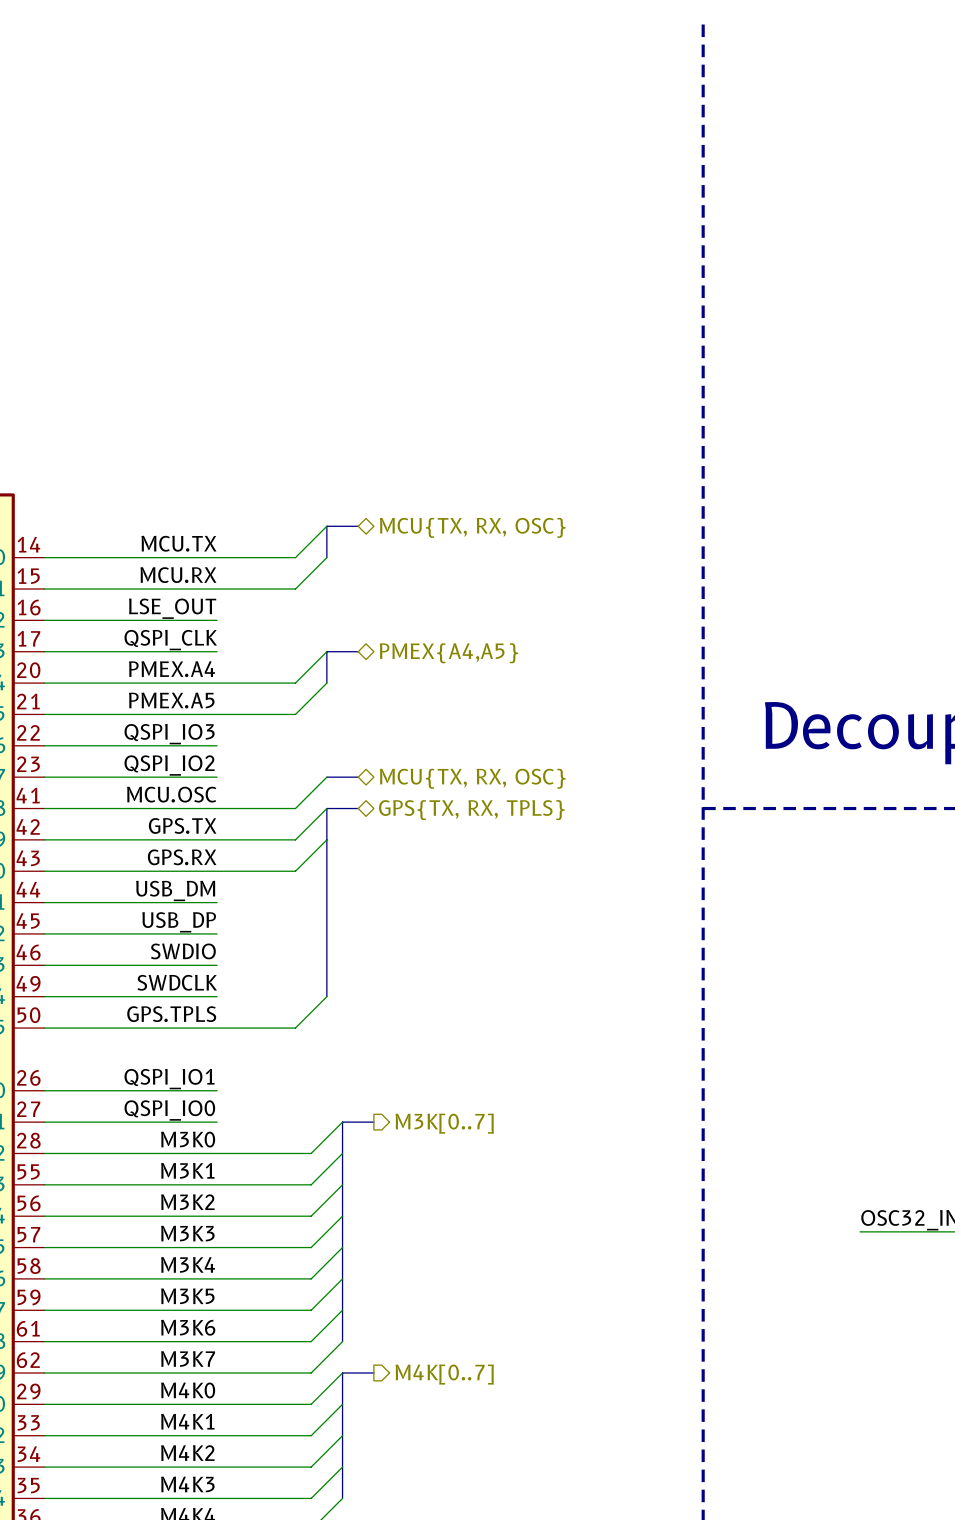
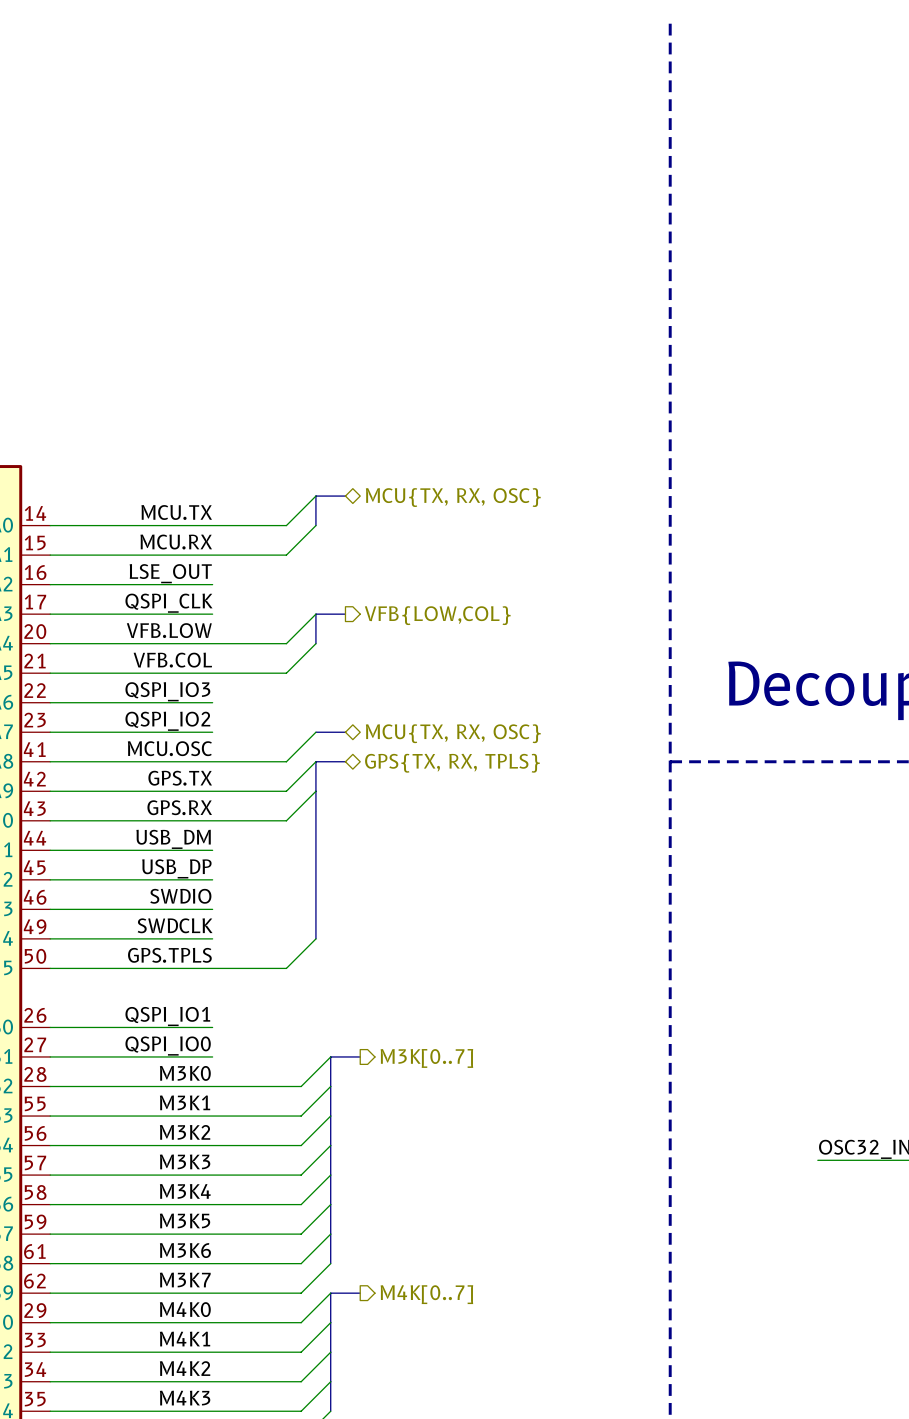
hierarchical label shape: bidirectional (448, 653) -> output (437, 615)
hierarchical label: PMEX{A4,A5} (448, 653) -> VFB{LOW,COL} (437, 615)
label: PMEX.A4 (171, 669) -> VFB.LOW (169, 630)
label: PMEX.A5 (171, 700) -> VFB.COL (172, 660)

